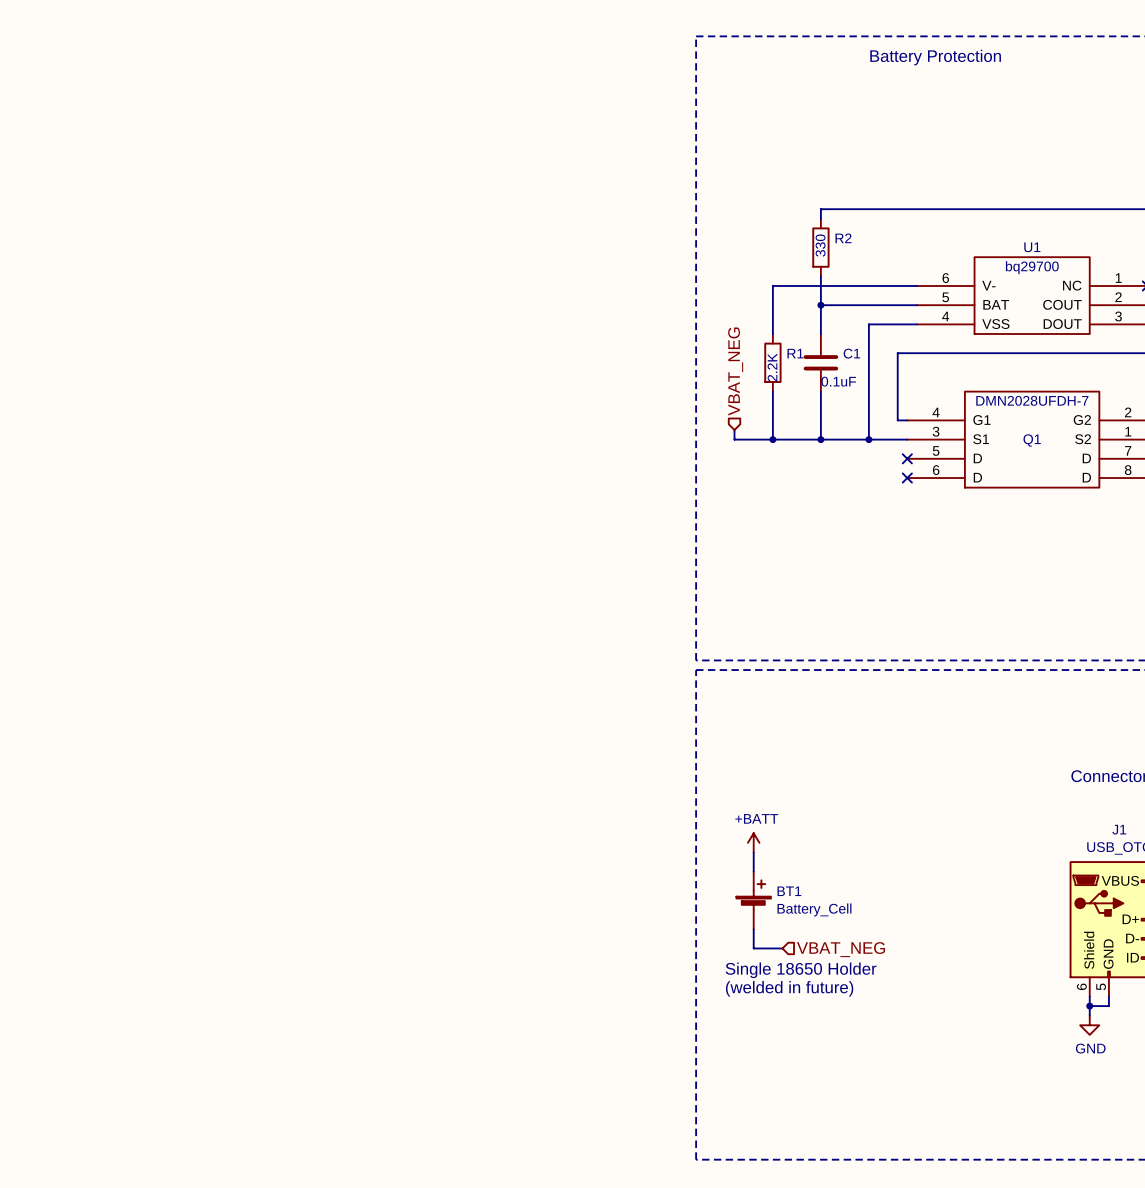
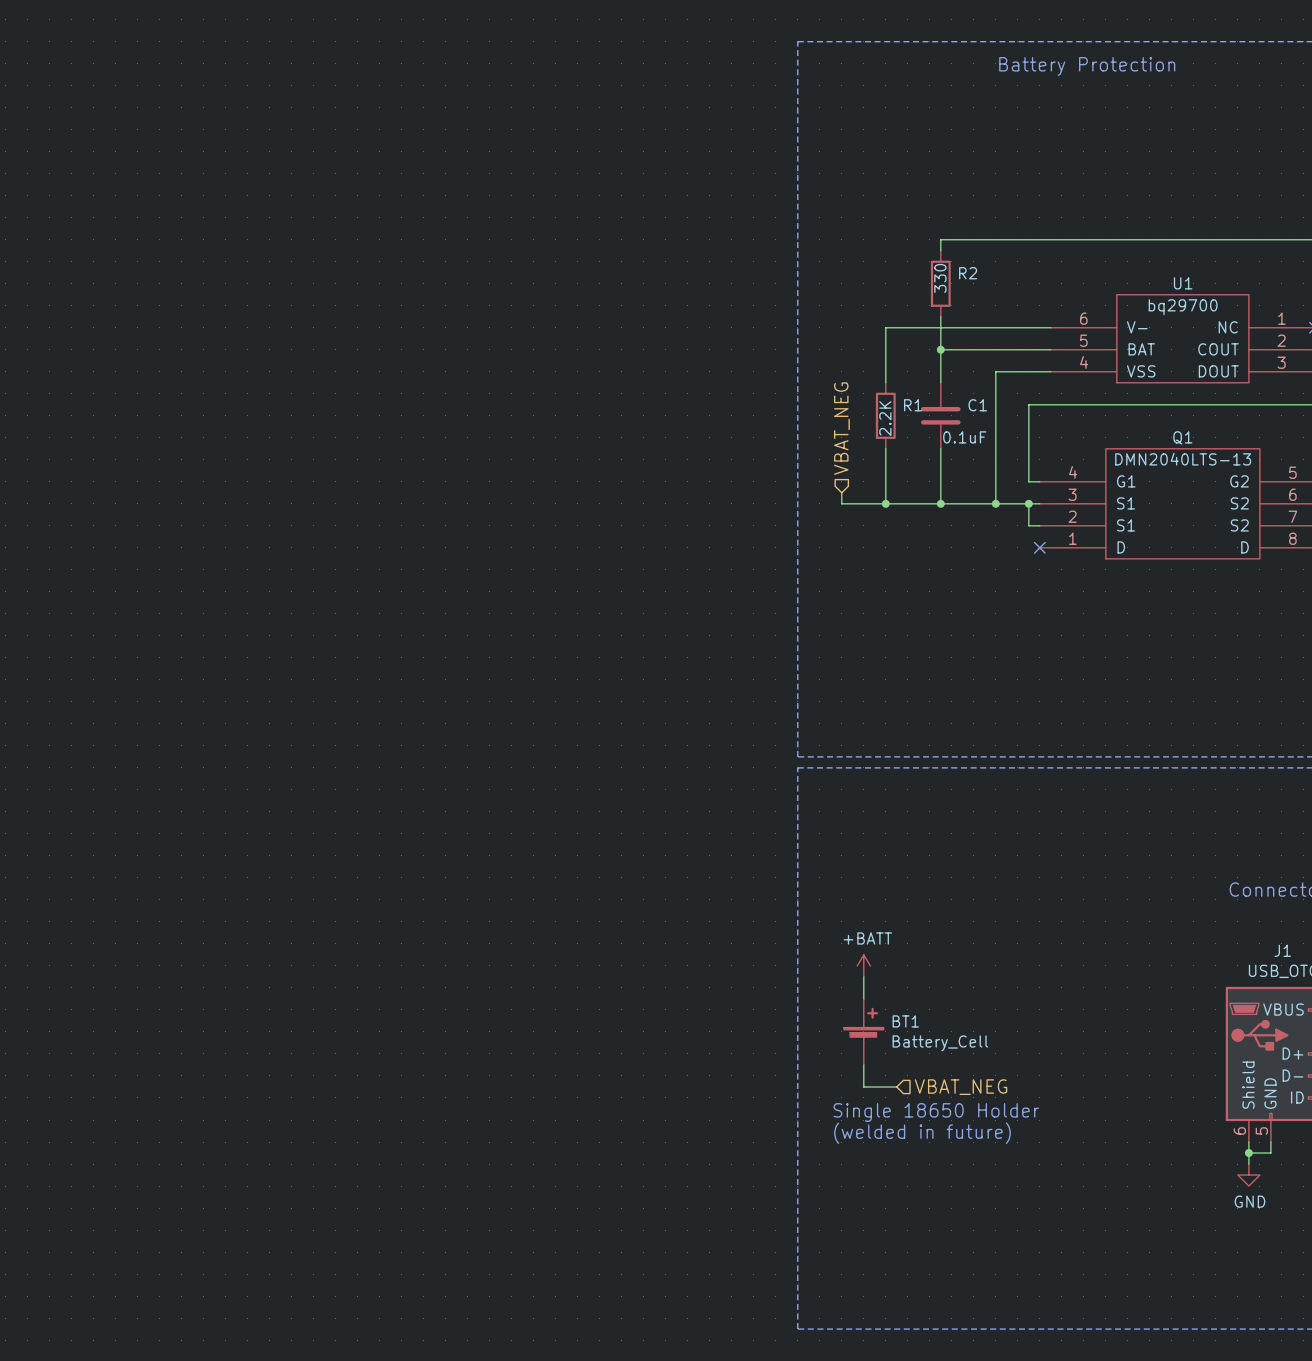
Q1 value: DMN2028UFDH-7 (1032, 400) -> DMN2040LTS-13 (1183, 459)
Q1 pin number: 2 (1128, 412) -> 5 (1292, 472)
Q1 pin number: 1 (1128, 431) -> 6 (1292, 494)
wire: none -> (1028, 503) (1028, 525) (1039, 525)
junction: none -> (1028, 503)
Q1 name position: Q1 (1032, 440) -> Q1 (1182, 437)
Q1 pin number: 5 (936, 450) -> 2 (1072, 516)
no-connect mark: (907, 458) -> none
Q1 pin name: D (977, 458) -> S1 (1126, 525)
Q1 pin name: D (1086, 458) -> S2 (1239, 525)
Q1 pin number: 6 (936, 470) -> 1 (1072, 538)

